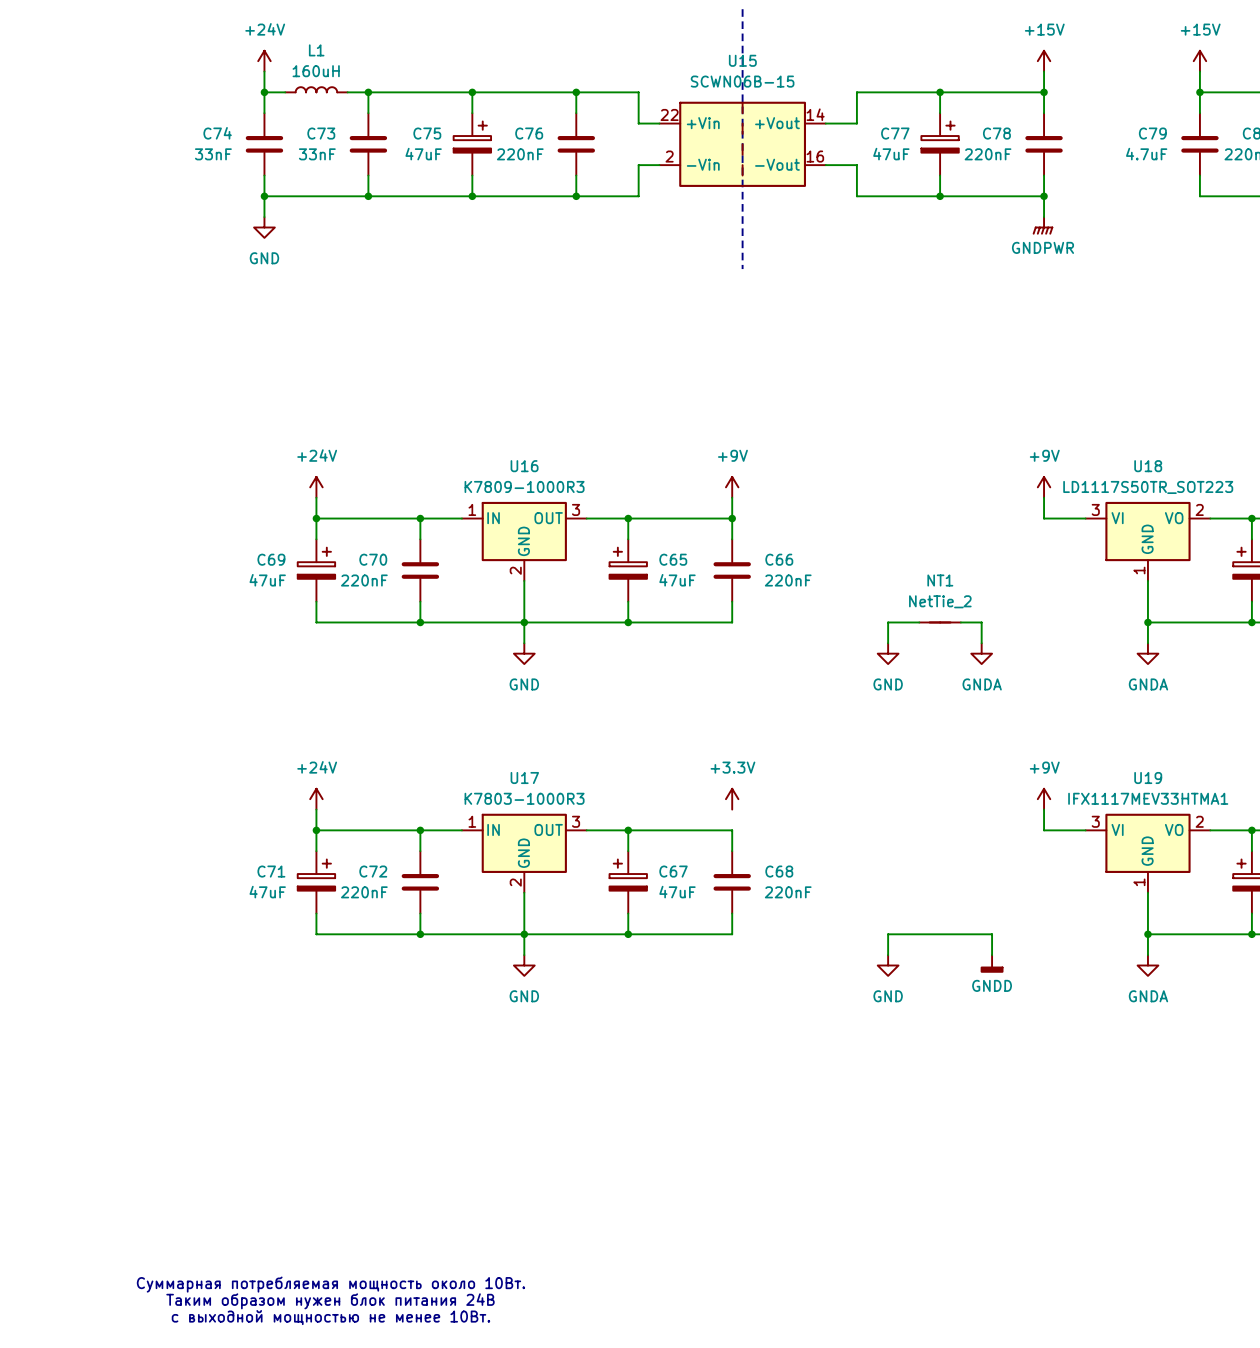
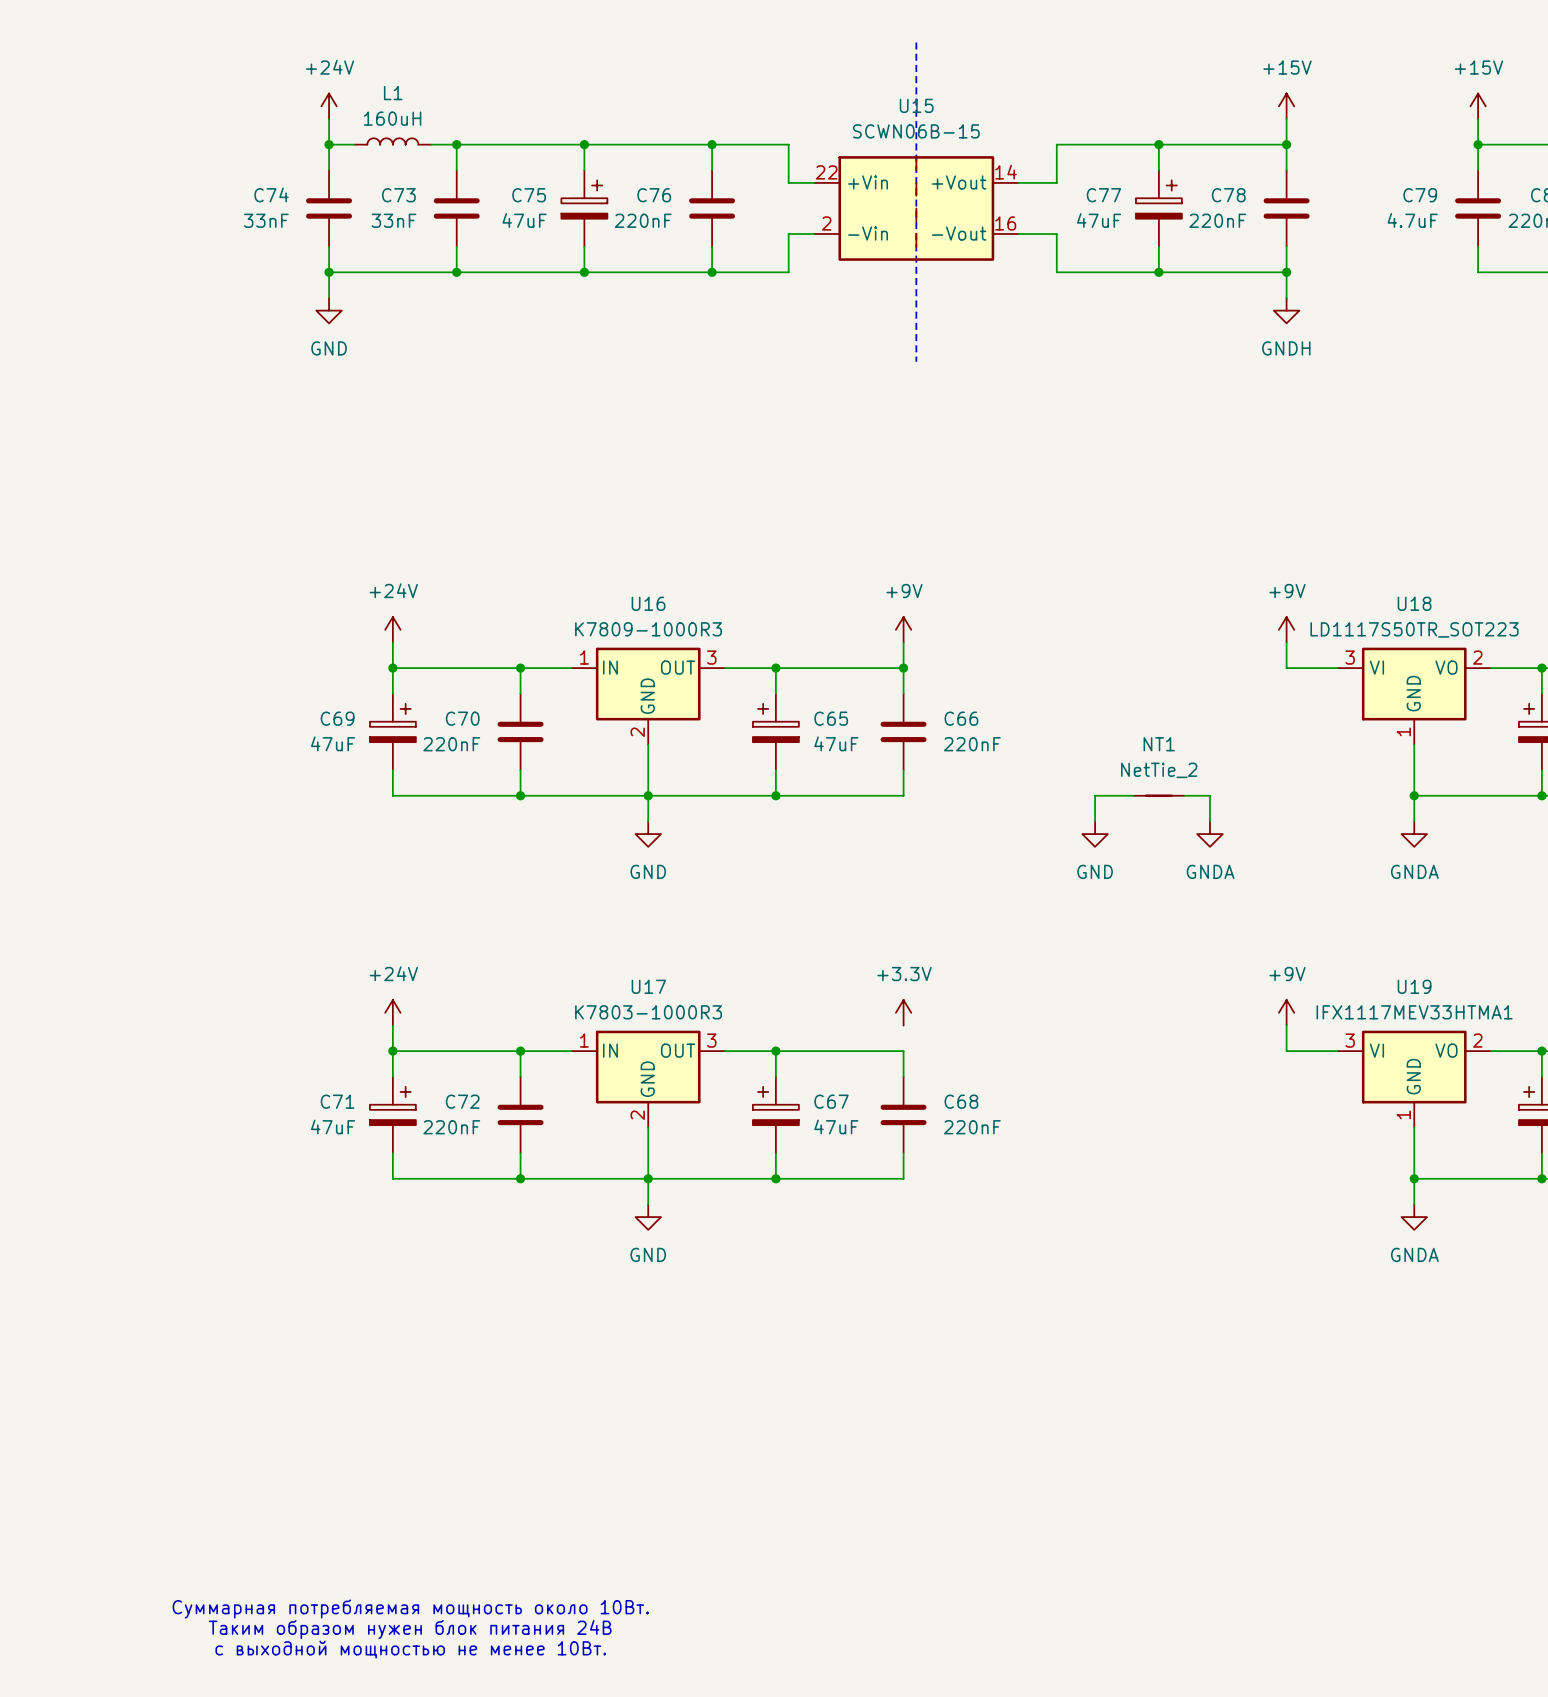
power symbol: GNDPWR (1042, 225) -> GNDH (1286, 310)
wire: (888, 955) (888, 934) (992, 934) (992, 955) -> none
power symbol: GNDD (992, 963) -> none
power symbol: GND (888, 965) -> none

